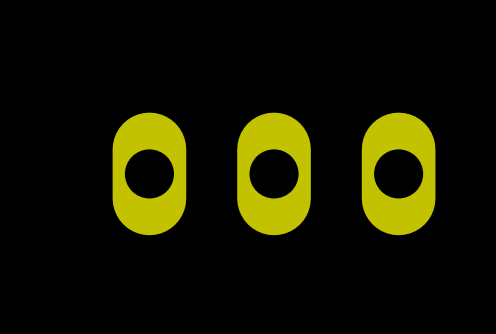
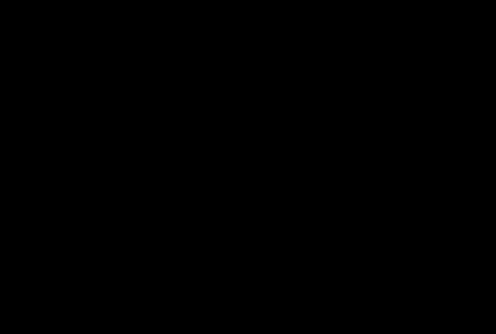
part: (274, 173) -> none

